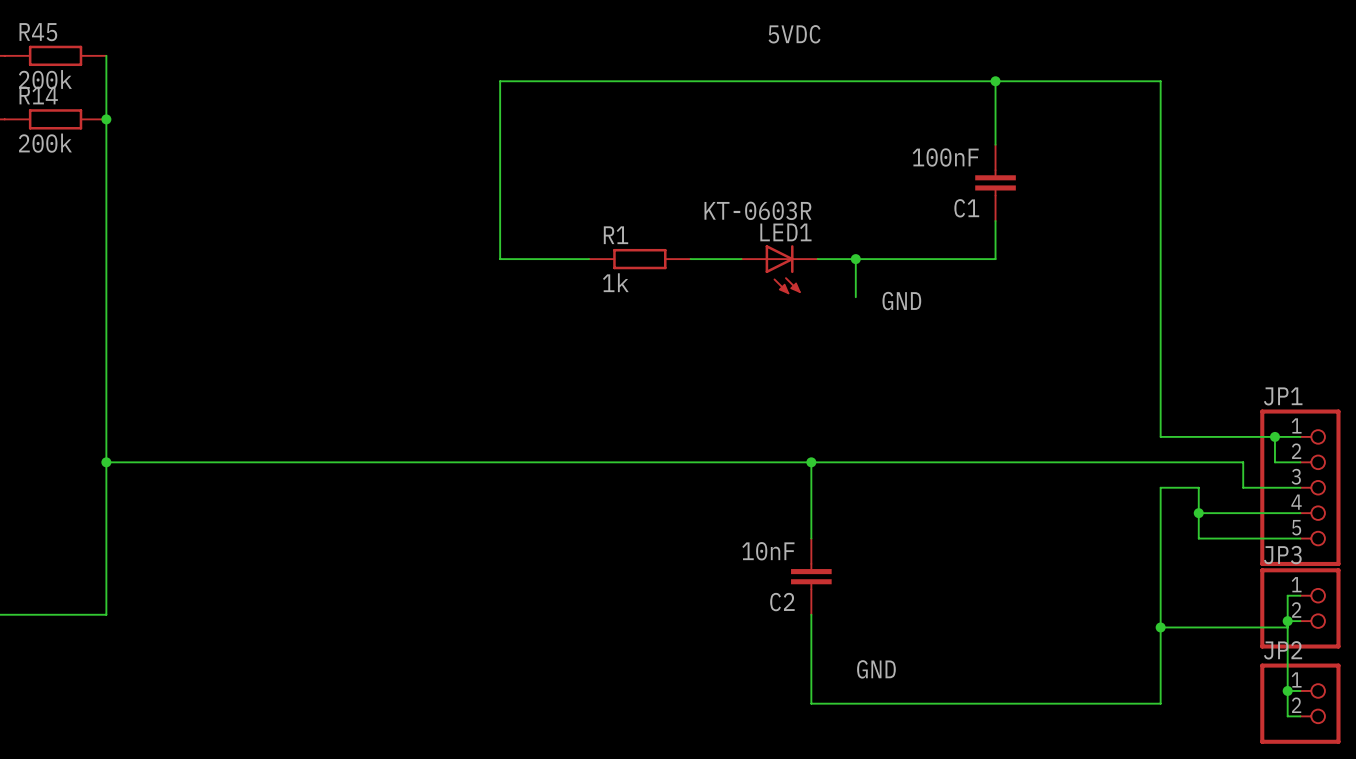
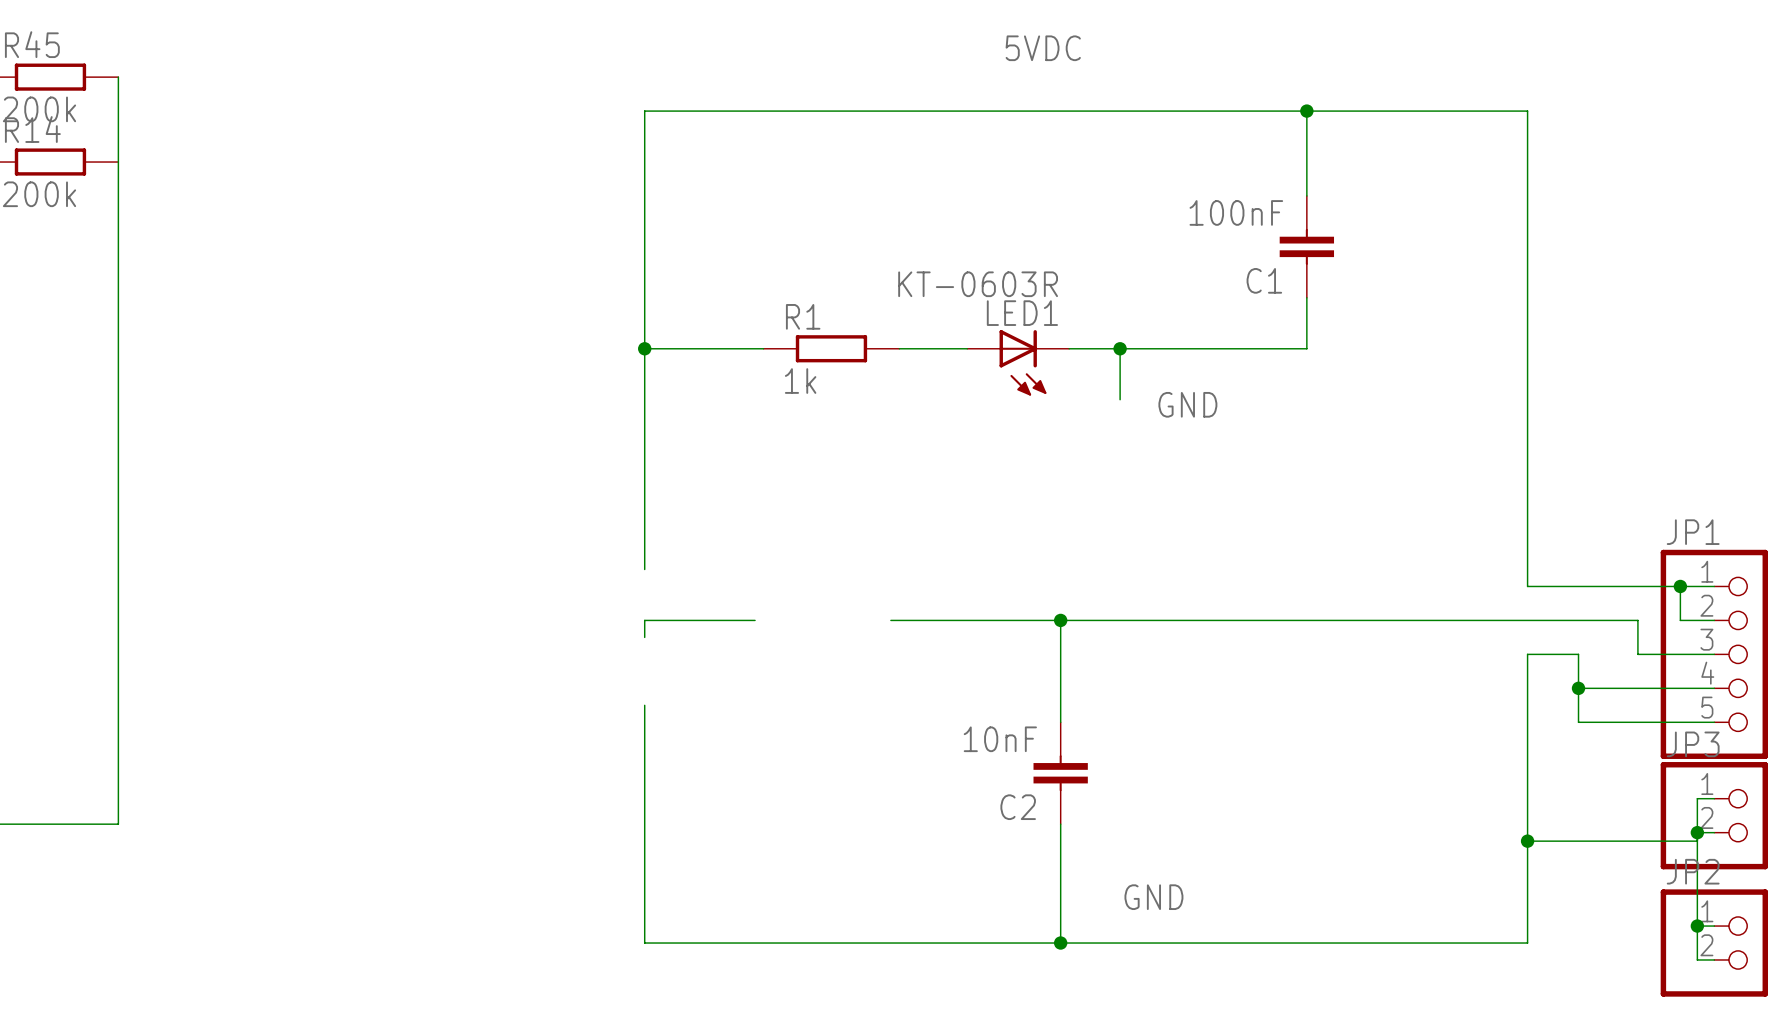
junction: (106, 119) -> none
wire: none -> (644, 348) (644, 569)
junction: none -> (644, 348)
wire: (106, 462) (500, 462) -> (644, 637) (644, 620)
junction: (106, 462) -> none
wire: (582, 462) (684, 462) -> none
wire: none -> (644, 705) (644, 943) (1060, 943)
junction: none -> (1060, 943)

